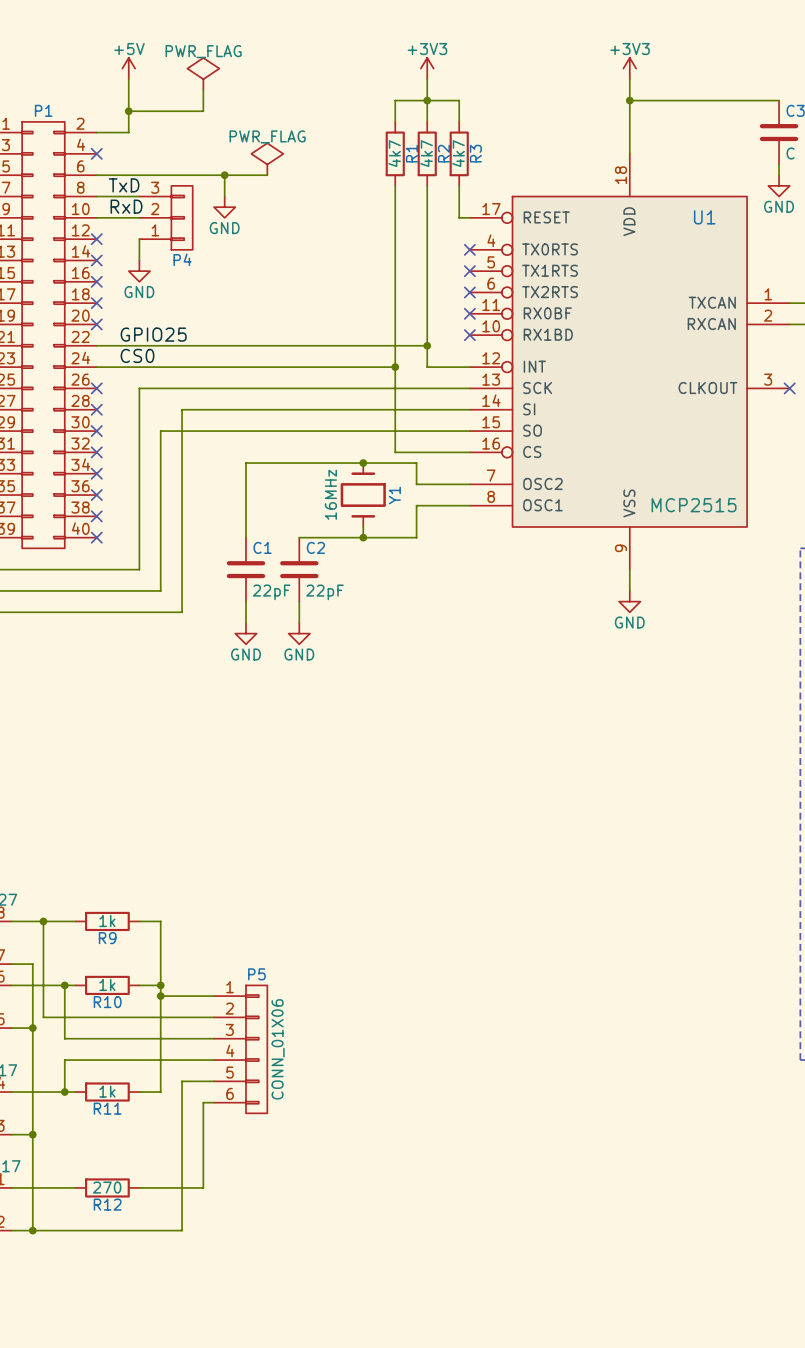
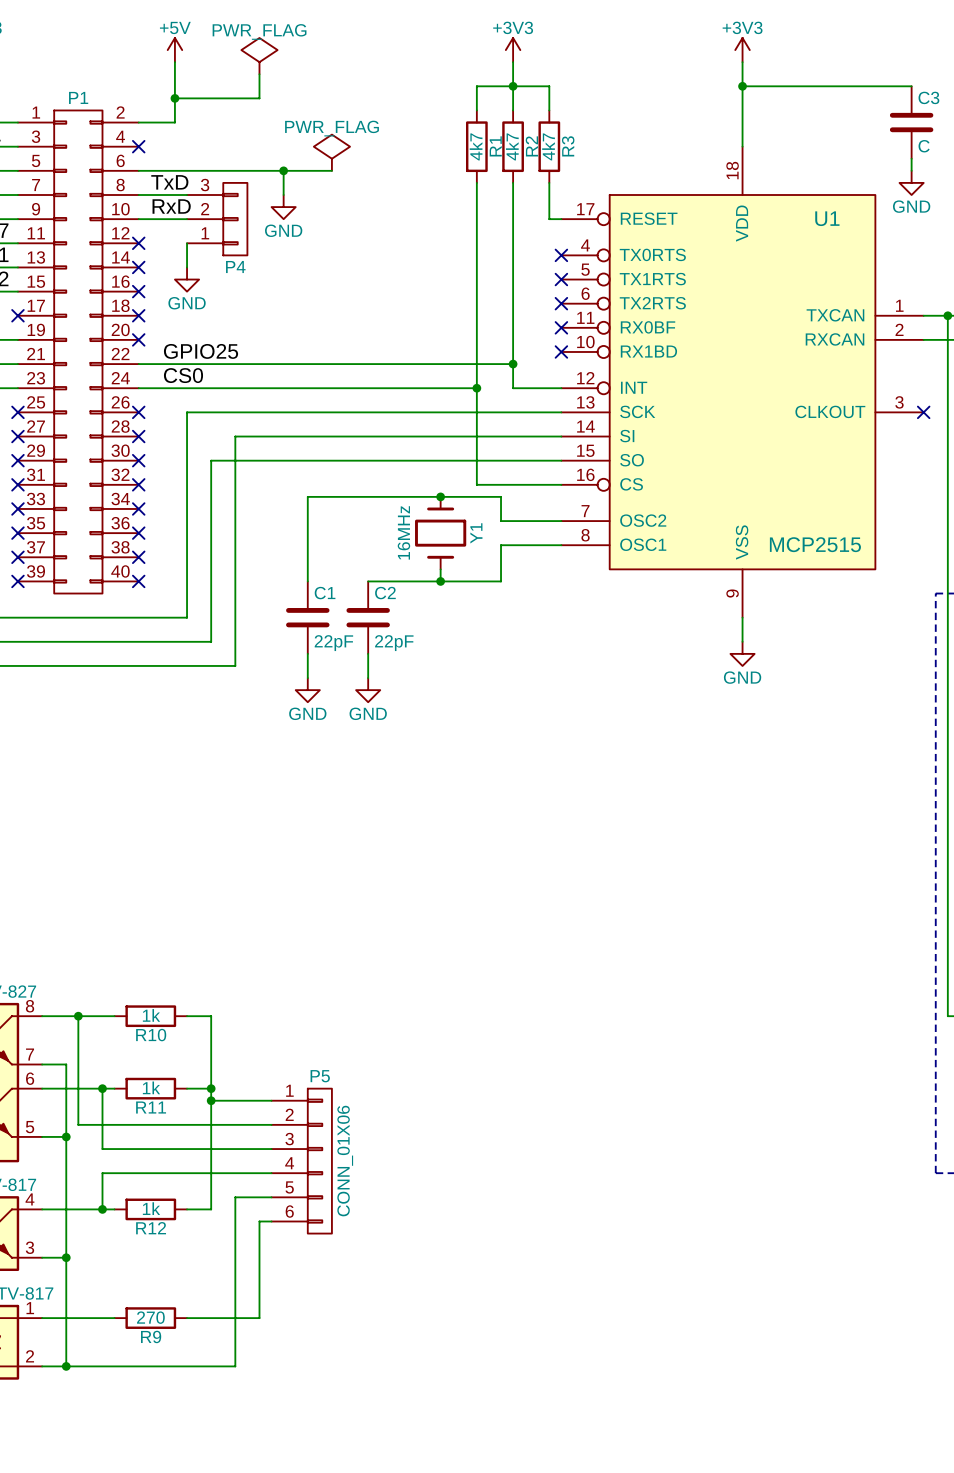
R9 name: R9 (107, 938) -> R10 (151, 1035)
R10 name: R10 (107, 1002) -> R11 (151, 1107)
R11 name: R11 (107, 1108) -> R12 (151, 1228)
R12 name: R12 (107, 1204) -> R9 (151, 1336)

